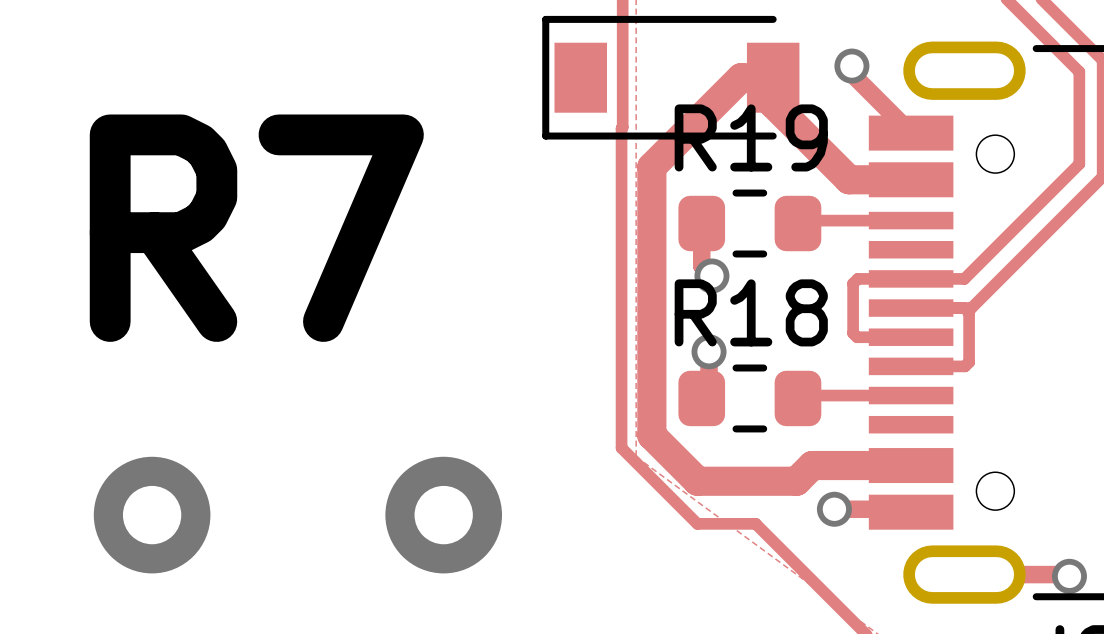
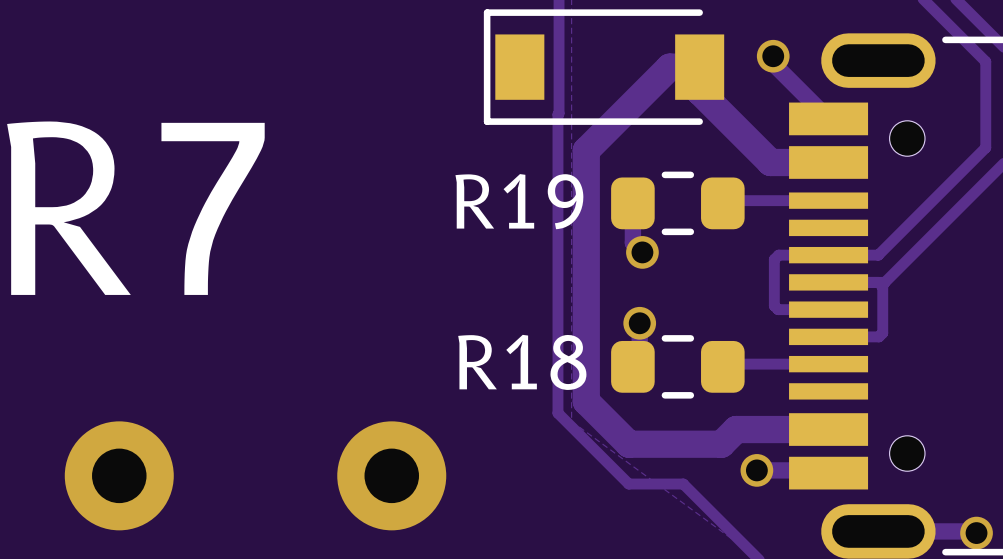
R19 name position: R19 (751, 137) -> R19 (519, 201)
R18 name position: R18 (751, 312) -> R18 (522, 362)

